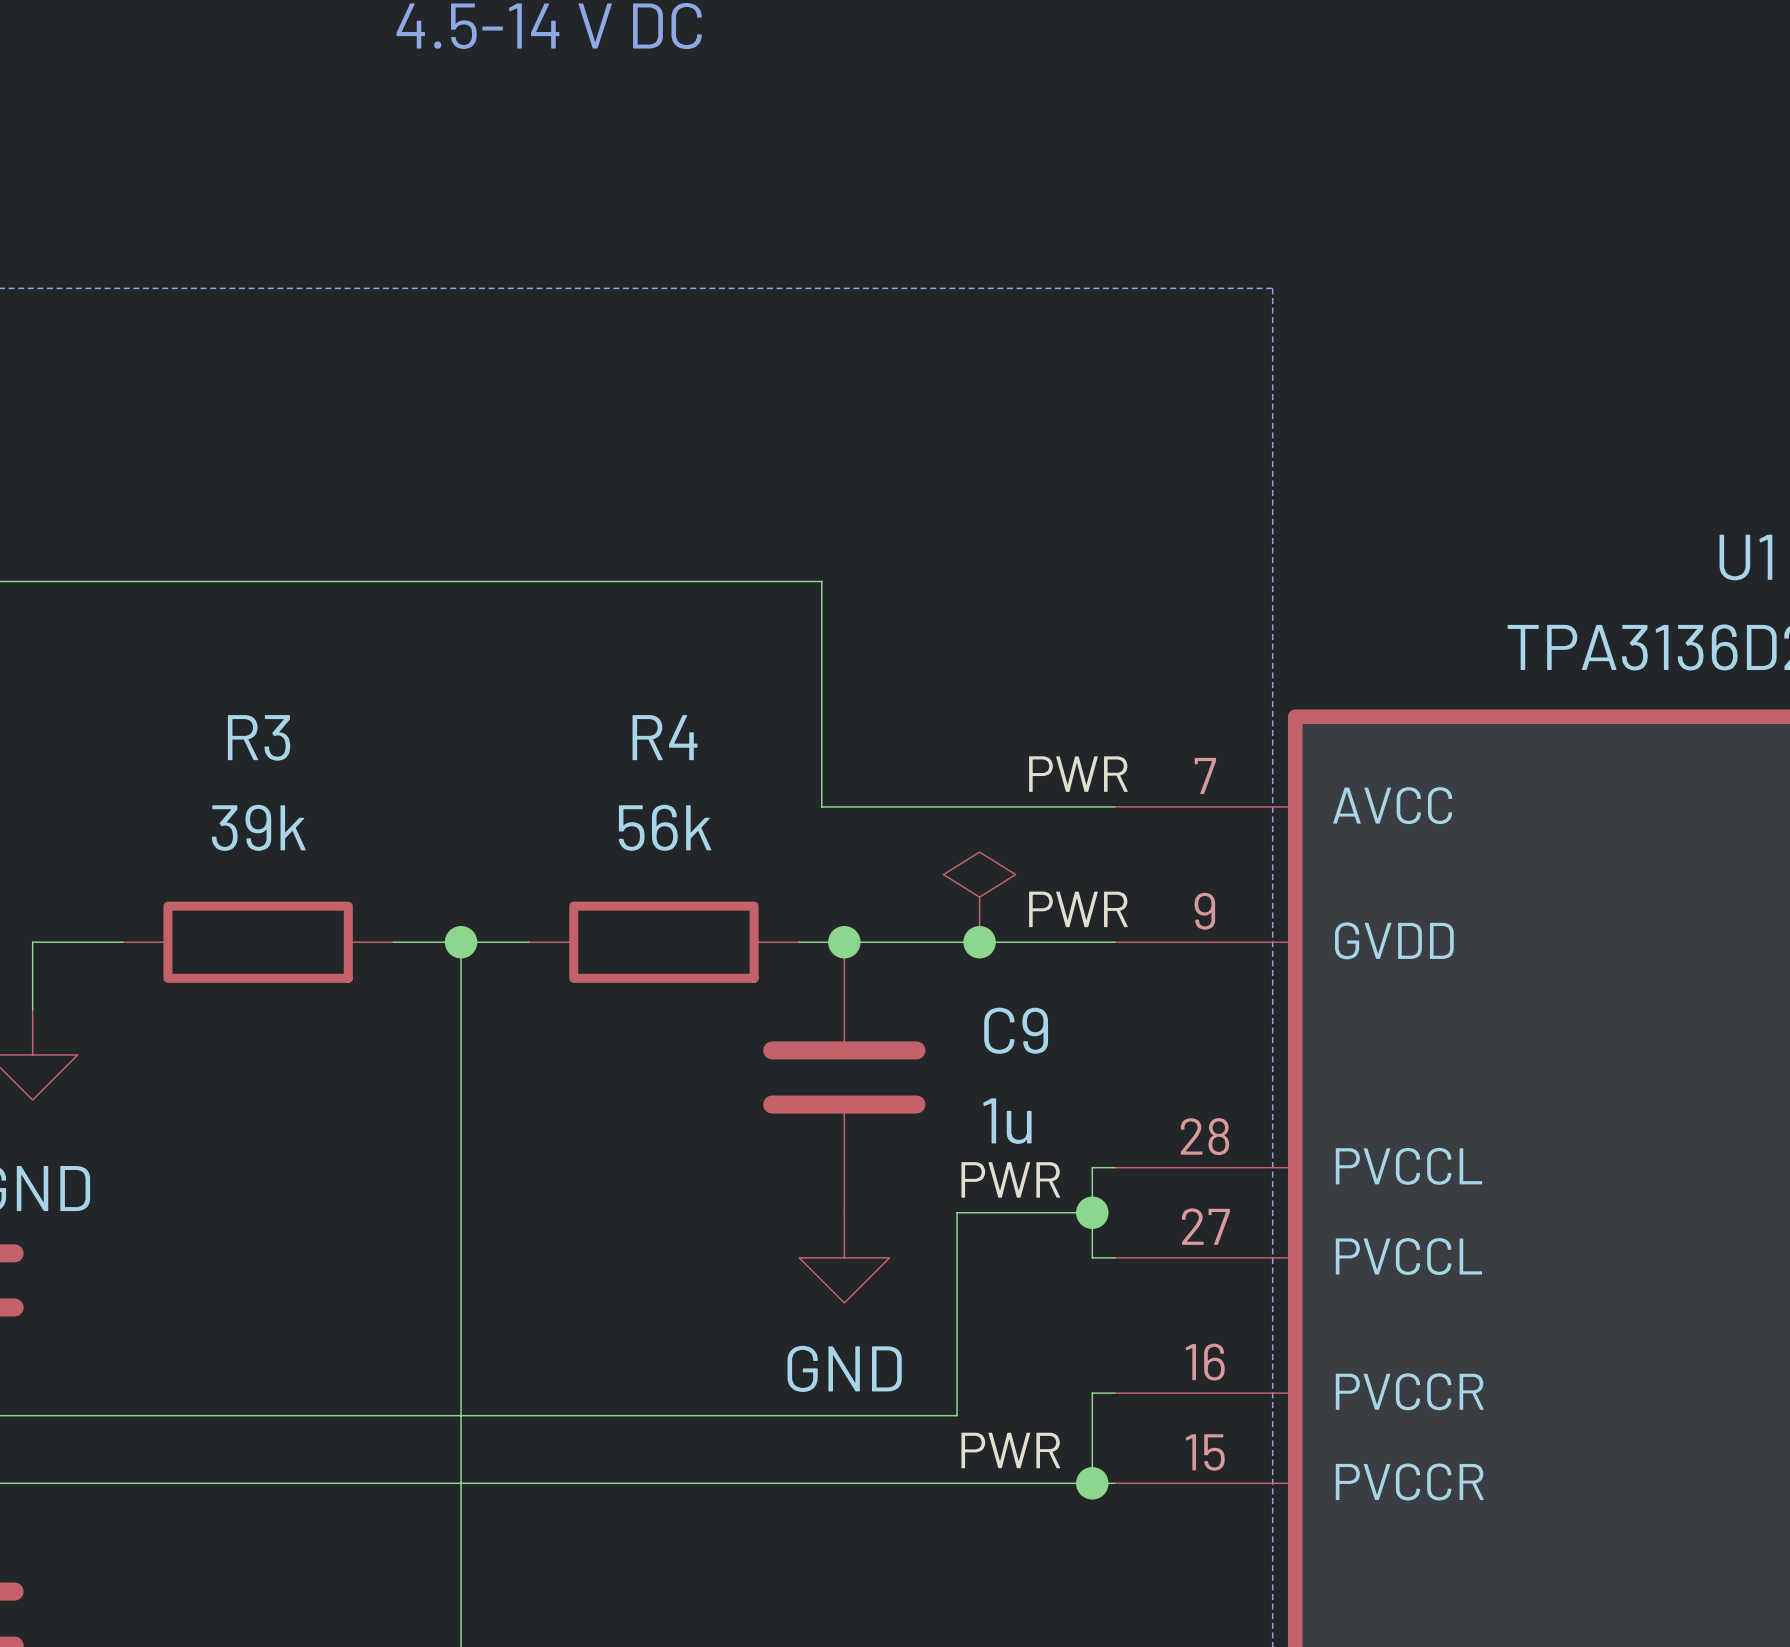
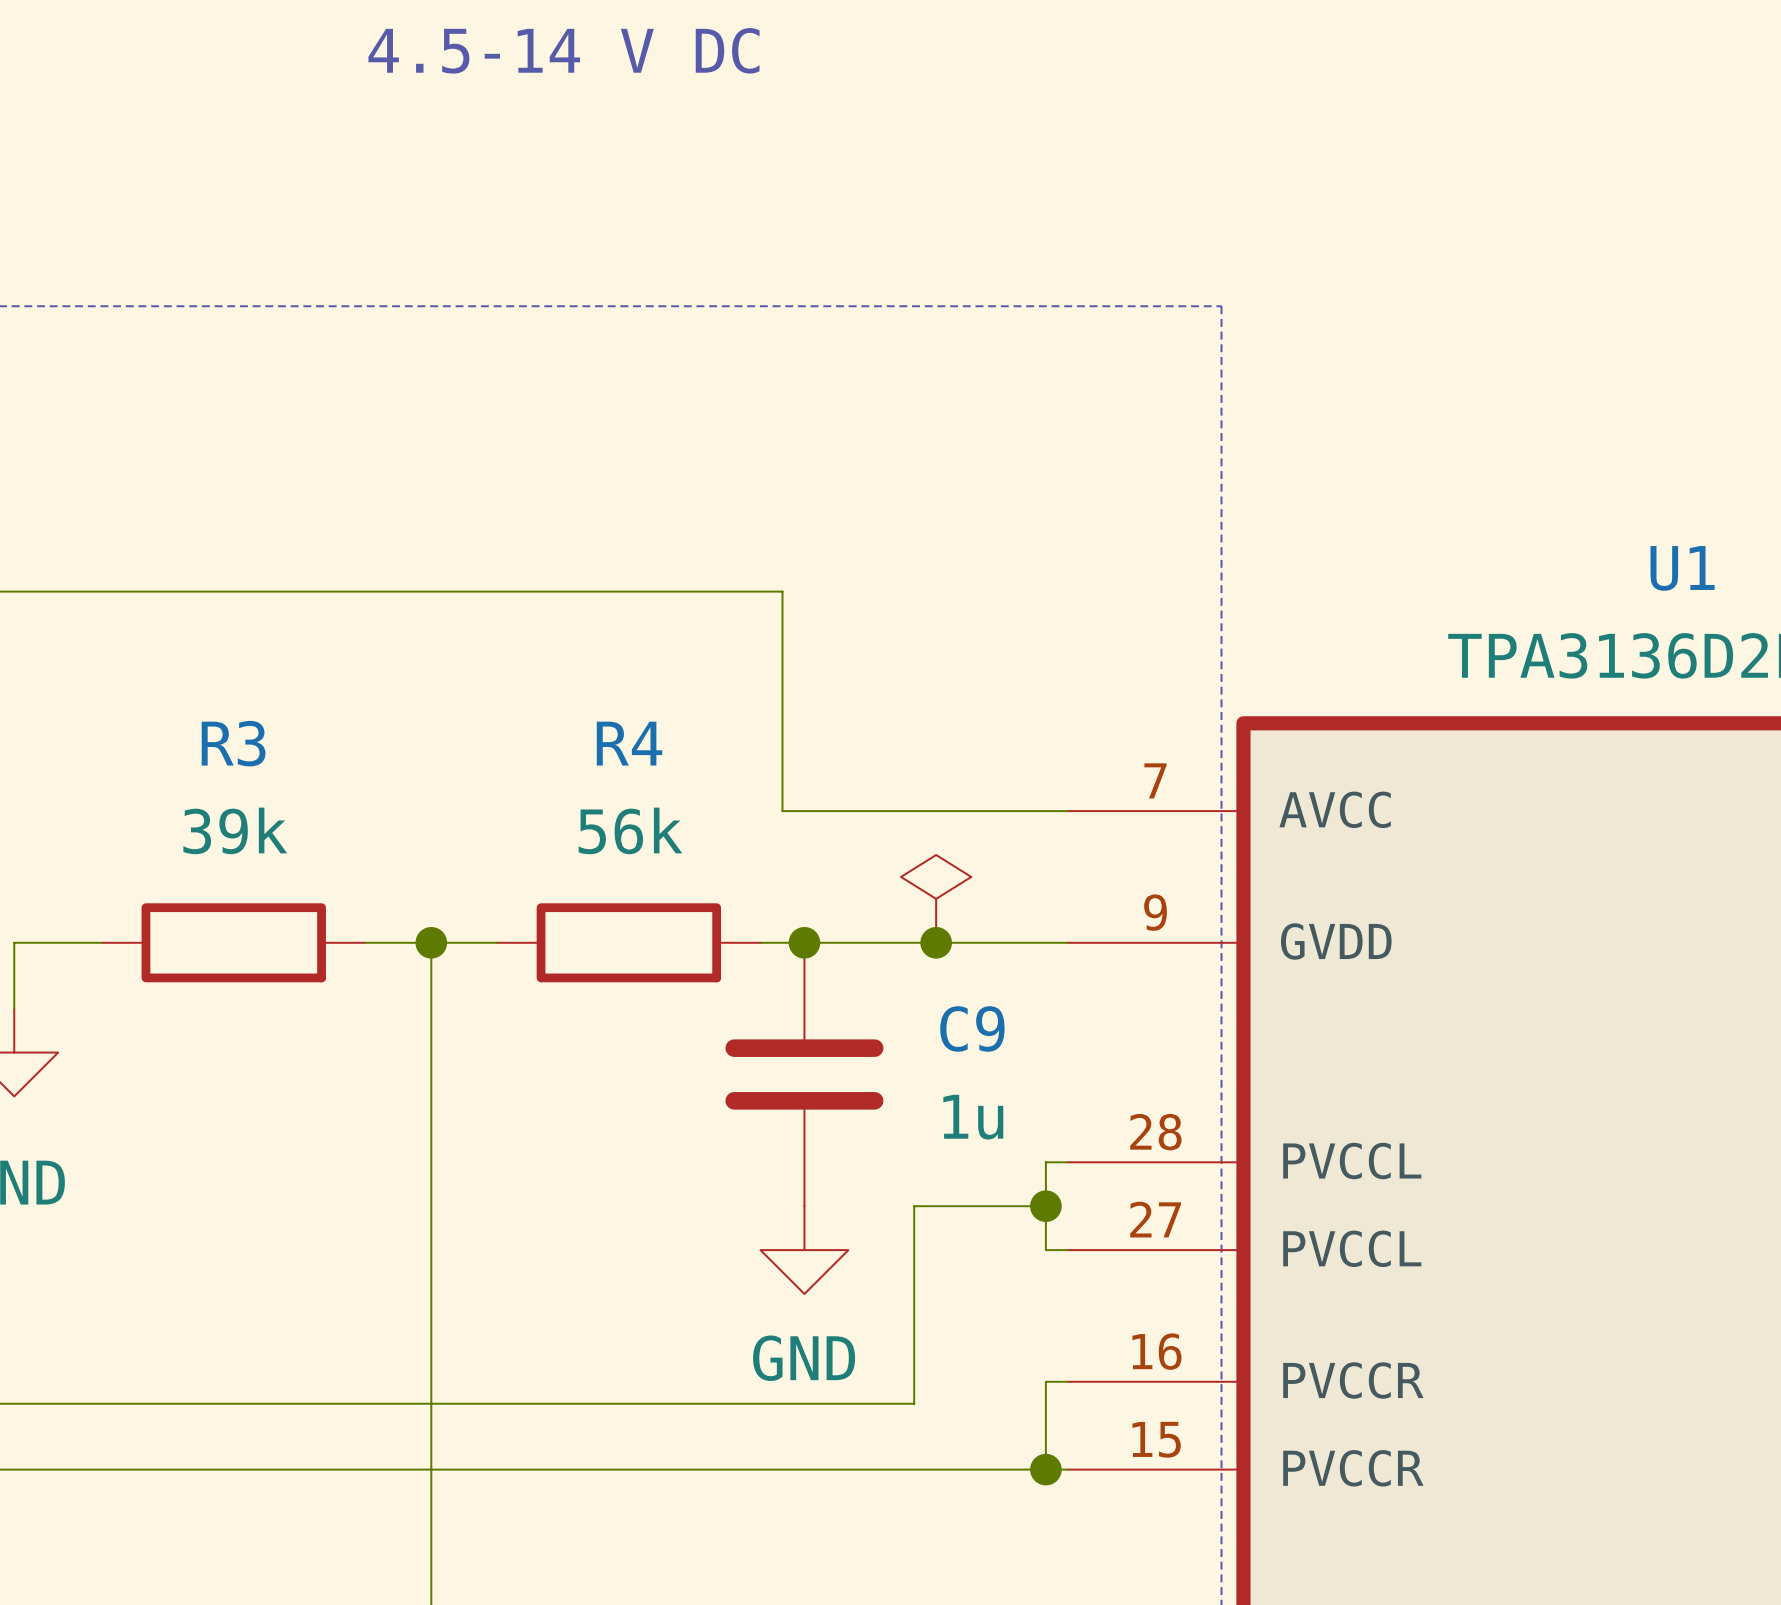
label: PWR (1078, 774) -> none
label: PWR (1078, 909) -> none
label: PWR (1010, 1179) -> none
label: PWR (1010, 1450) -> none

